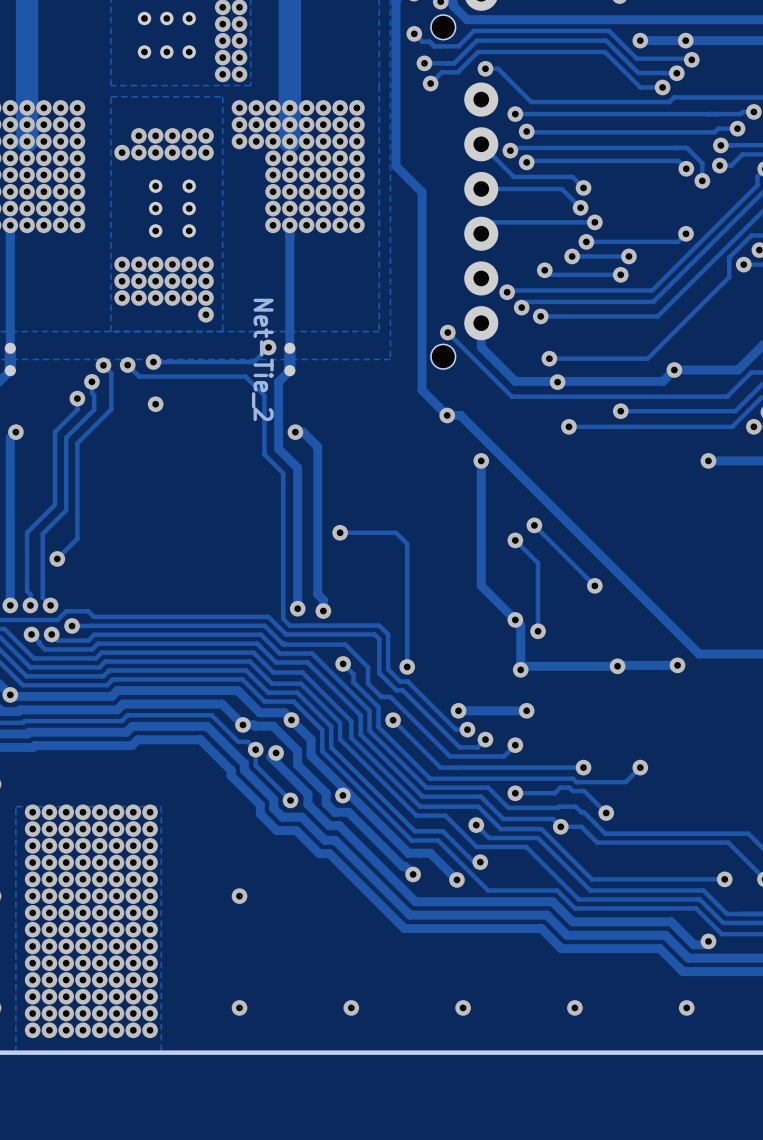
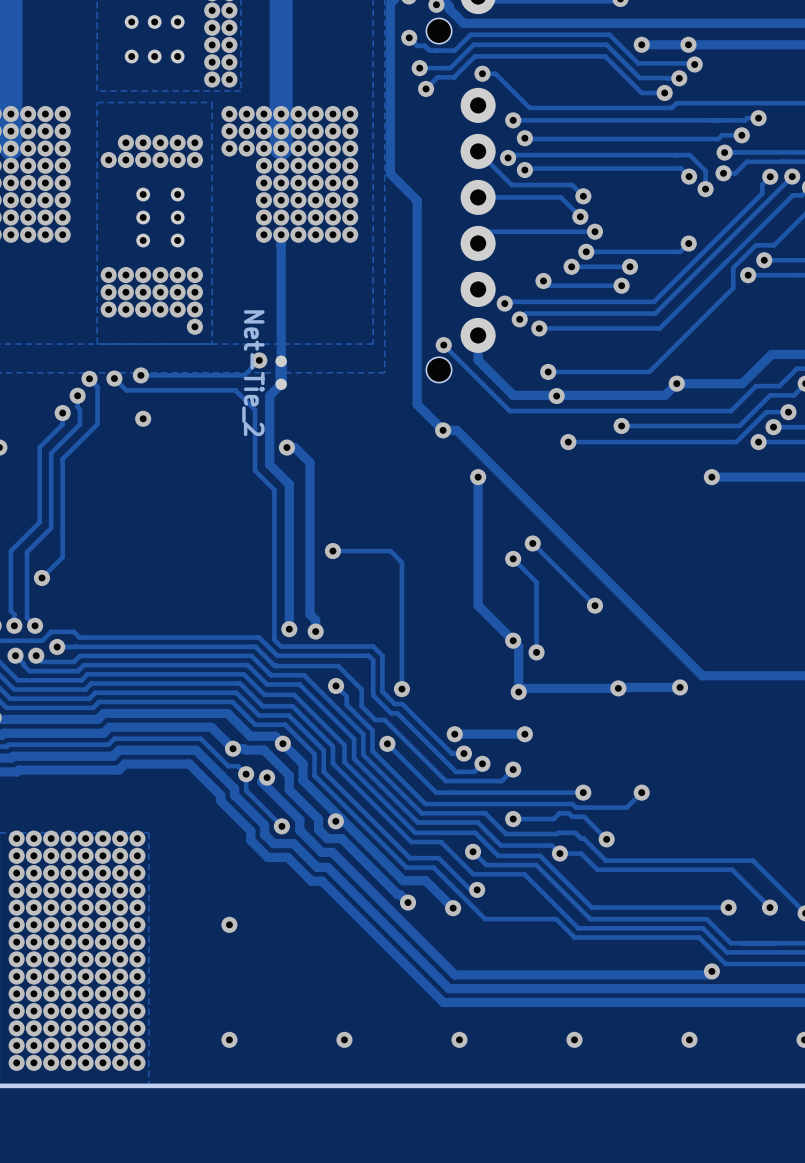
track: (415, 901) (552, 901) (572, 921) (671, 921) (693, 944) -> (410, 930) (454, 974) (696, 974)
track: (409, 915) (546, 915) (567, 935) (665, 935) (688, 958) -> (404, 944) (449, 988) (691, 988)
track: (404, 928) (541, 928) (561, 948) (659, 948) (682, 971) -> (399, 958) (443, 1002) (685, 1002)

